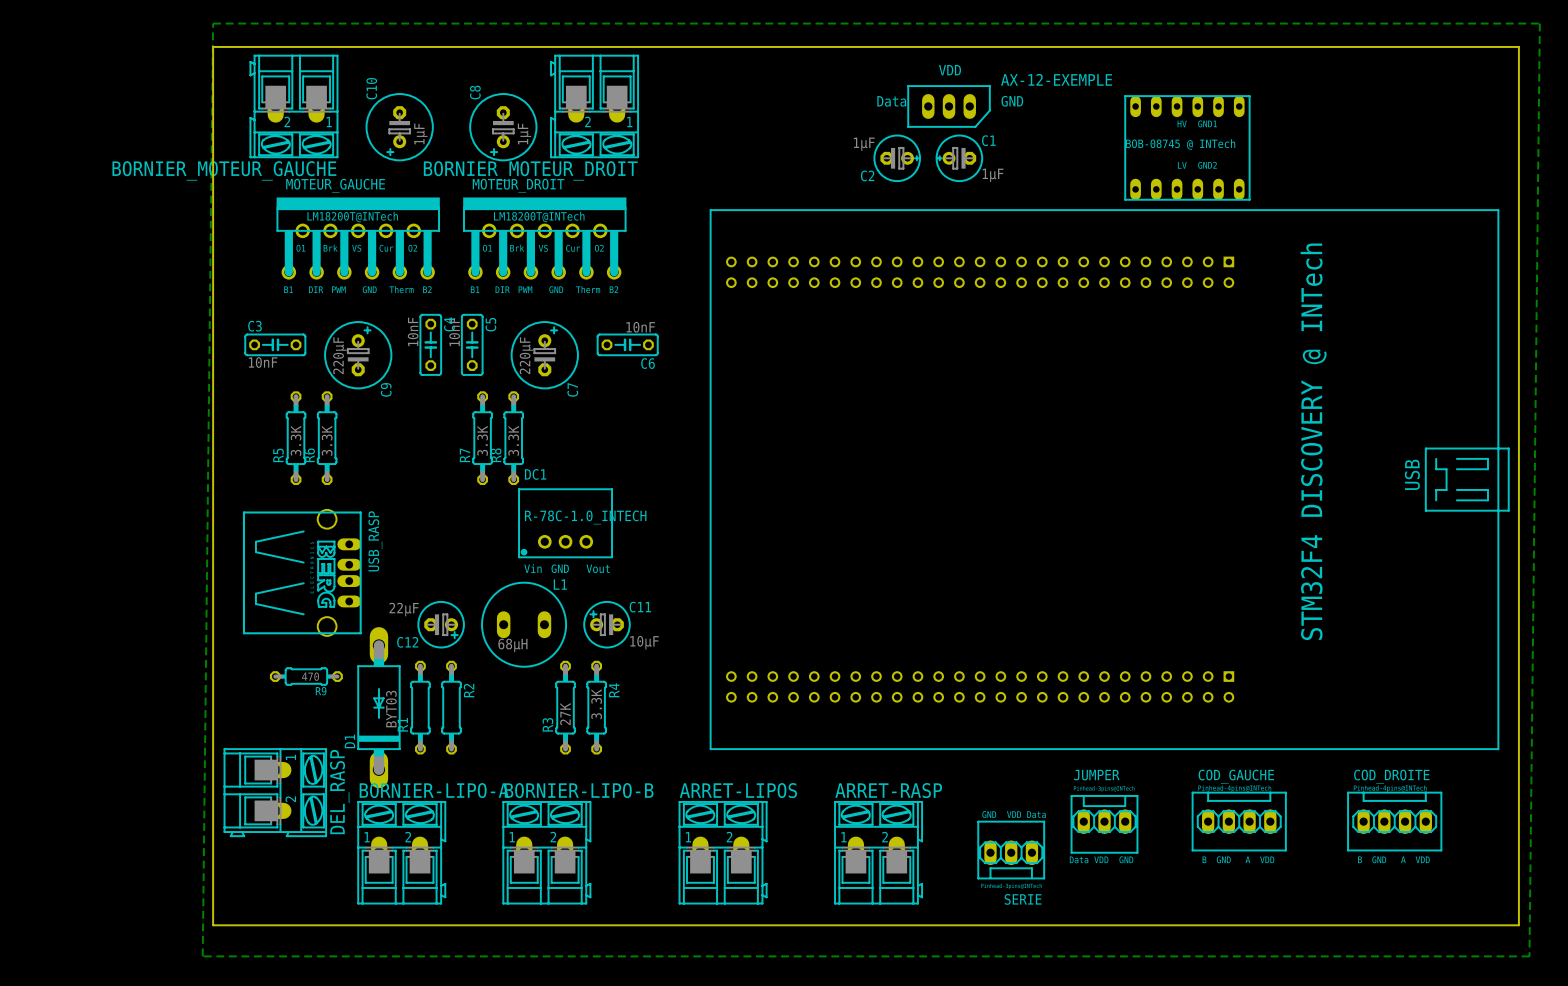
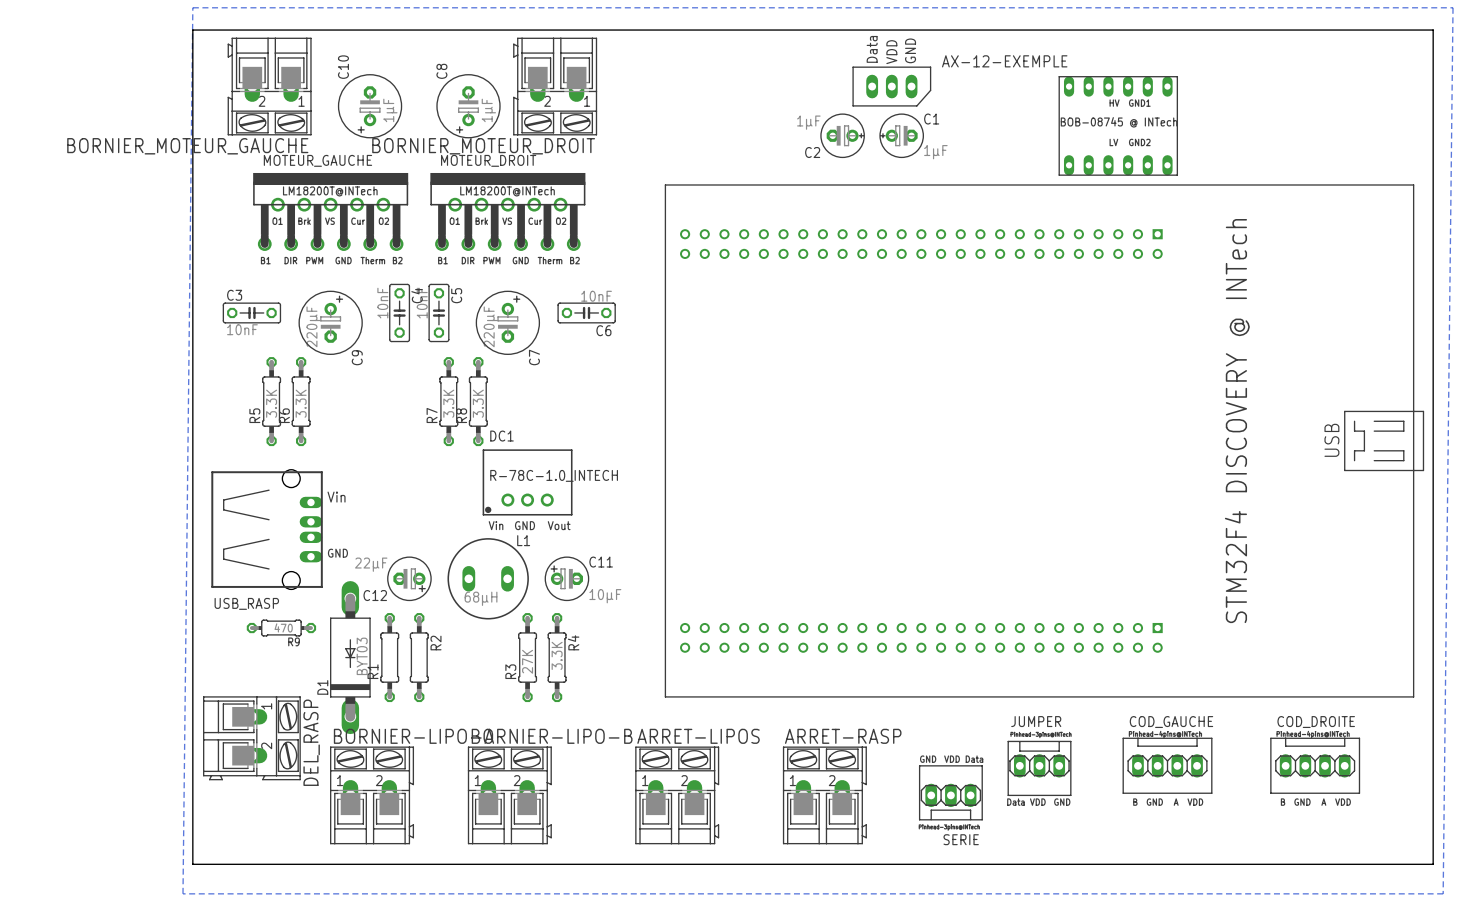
AX-12-EXEMPLE text rotation: 0° (949, 70) -> 90° counterclockwise (891, 52)
AX-12-EXEMPLE text rotation: 0° (891, 101) -> 90° counterclockwise (872, 49)
AX-12-EXEMPLE text position: Data (891, 101) -> Data (872, 49)
AX-12-EXEMPLE text rotation: 0° (1012, 101) -> 90° counterclockwise (910, 50)
AX-12-EXEMPLE text position: GND (1012, 101) -> GND (910, 50)
USB_RASP: none -> (267, 529)
USB_RASP: (302, 572) -> none

